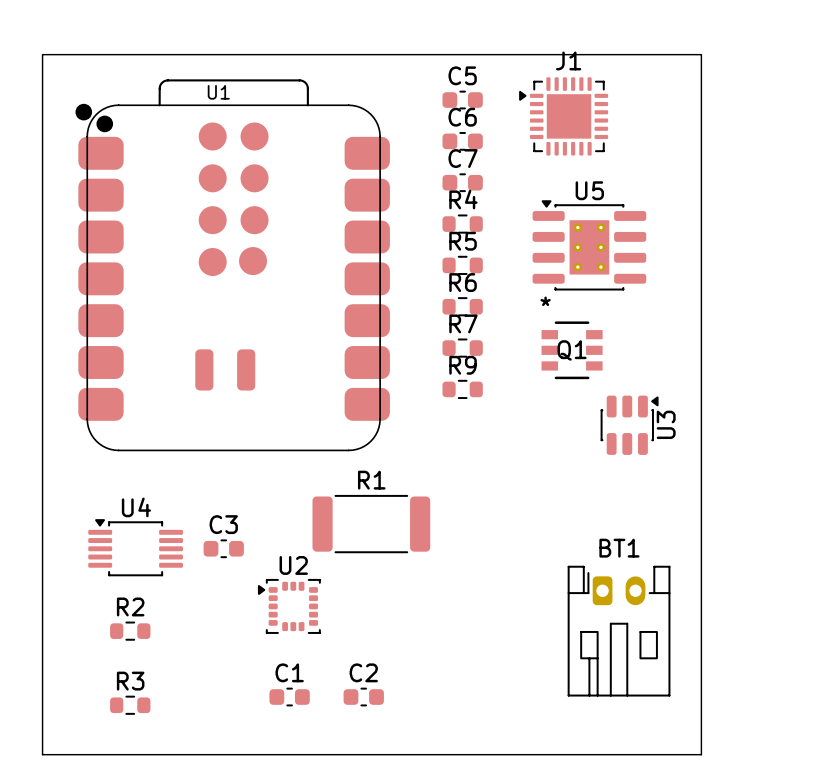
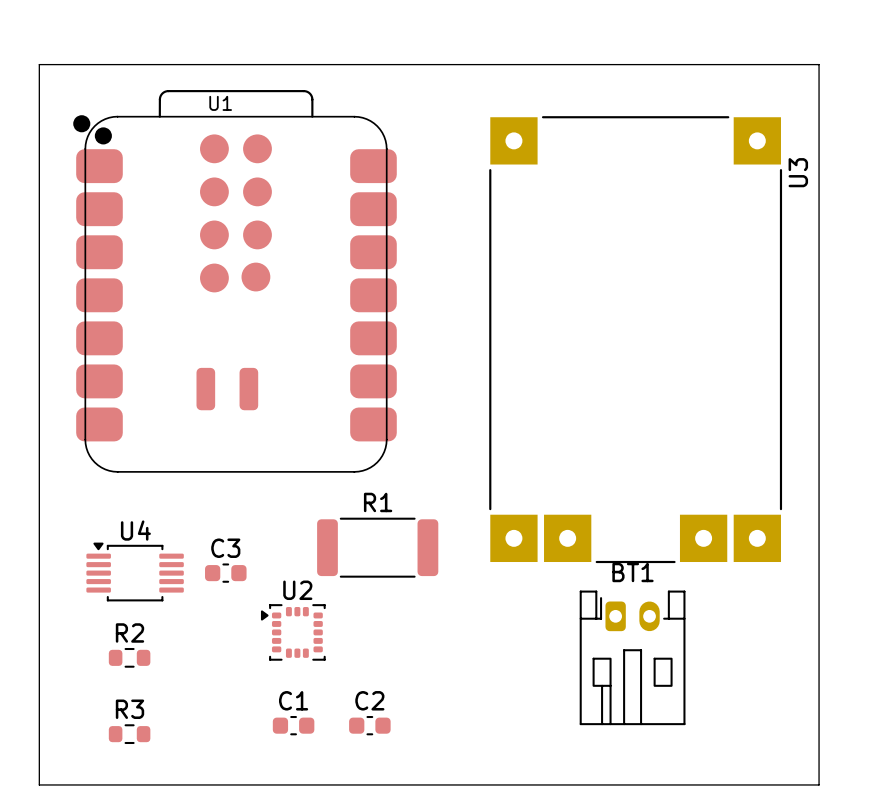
board edge: (701, 54) (701, 754) -> (717, 64) (819, 64) (819, 784) (717, 784)
C5: (462, 100) -> none
J1: (563, 116) -> none
C6: (462, 141) -> none
C7: (462, 182) -> none
R4: (462, 224) -> none
U5: (589, 245) -> none
R5: (462, 265) -> none
R6: (462, 306) -> none
R7: (462, 348) -> none
Q1: (572, 350) -> none
R9: (462, 389) -> none
U3 footprint: [600, 395, 659, 455] -> [489, 116, 783, 564]
U3 name position: U3 (666, 424) -> U3 (798, 172)

